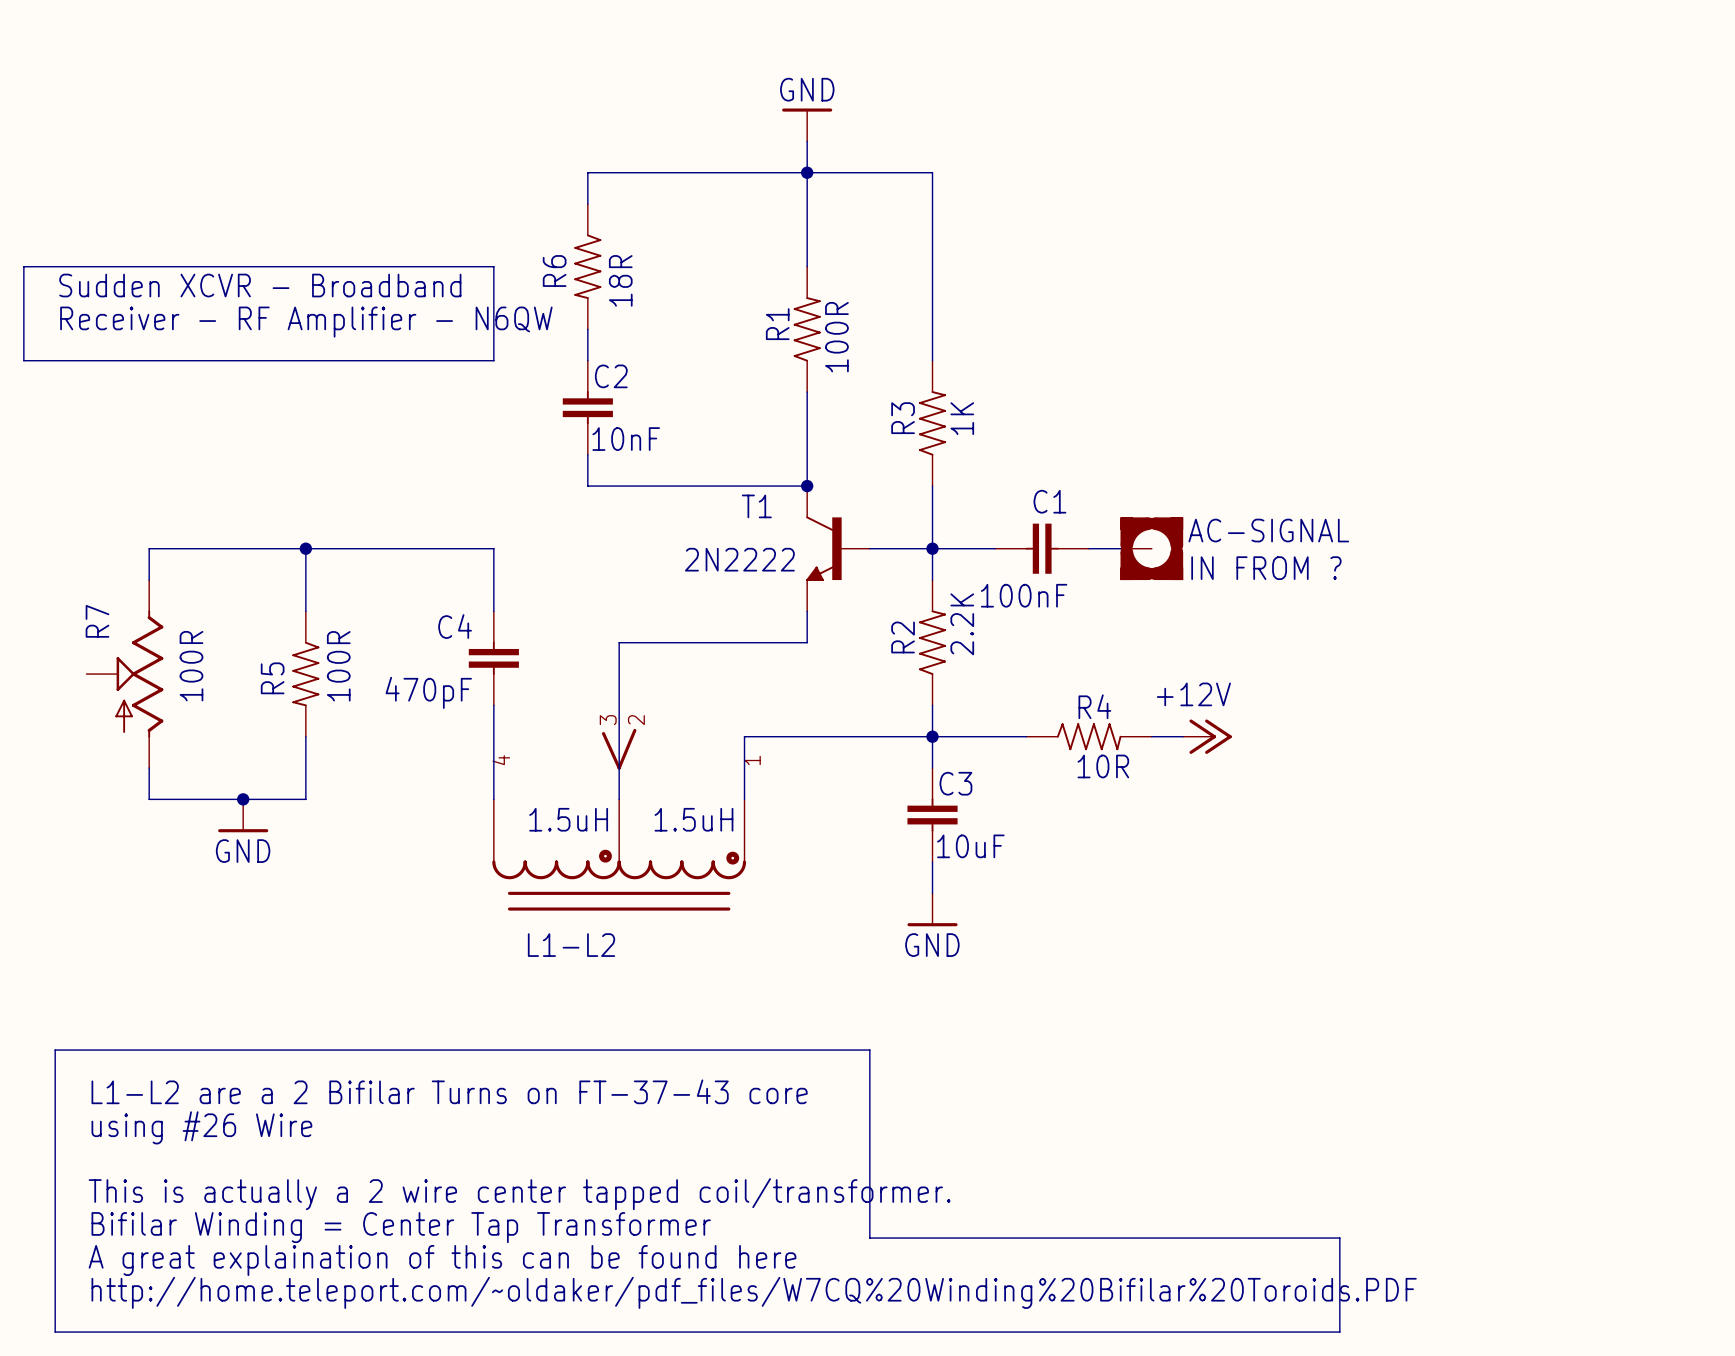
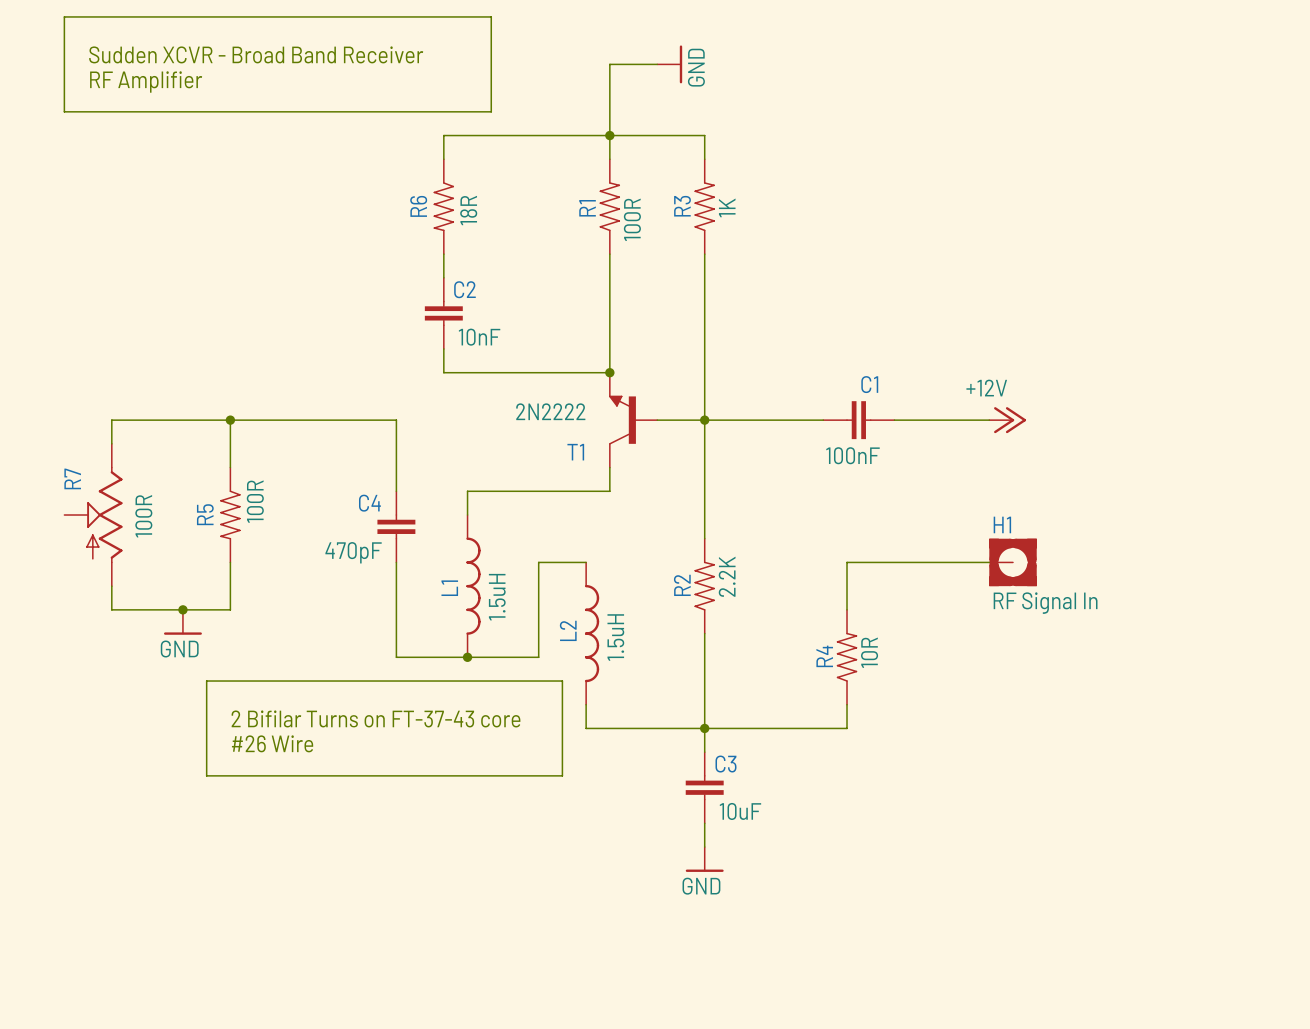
wire: none -> (64, 16) (64, 111) (491, 111) (491, 16) (64, 16)
text: none -> Sudden XCVR - Broad Band Receiver (256, 54)
wire: none -> (657, 64) (609, 64) (609, 111)
text: none -> RF Amplifier (146, 81)
power symbol rotation: 0° (807, 110) -> 90° clockwise (680, 64)
power symbol position: GND (807, 124) -> GND (669, 64)
wire: (23, 266) (23, 360) (493, 360) (493, 266) (23, 266) -> none
text: Sudden XCVR - Broadband (260, 285) -> none
text: Receiver - RF Amplifier - N6QW (306, 322) -> none
R1 position: (807, 329) -> (609, 206)
R3 position: (932, 423) -> (704, 206)
wire: (493, 548) (493, 611) -> (372, 420) (396, 420) (396, 491)
T1 flip: as is (823, 548) -> up-down (622, 420)
C1 position: (1042, 548) -> (858, 420)
AC-SIGNAL: IN FROM ? (1151, 548) -> none
wire: none -> (894, 420) (989, 420)
R2 position: (932, 642) -> (704, 586)
C4 position: (493, 658) -> (396, 526)
wire: (619, 674) (619, 799) -> none
wire: (493, 705) (493, 799) -> none
wire: (744, 736) (744, 799) -> (562, 562) (538, 562) (538, 657) (396, 657) (396, 562)
wire: (775, 736) (1026, 736) -> none
junction: (932, 736) -> none
R4 rotation: 0° (1089, 736) -> 90° counterclockwise (847, 657)
R4 position: (1089, 736) -> (847, 657)
wire: none -> (870, 562) (847, 562) (847, 609)
wire: none -> (894, 562) (989, 562)
part position: (1207, 736) -> (1007, 420)
H1: none -> RF Signal In (1013, 562)
L1: none -> 1.5uH (473, 586)
C3 position: (932, 815) -> (704, 787)
text: 1.5uH (568, 819) -> none
L1-L2: (619, 819) -> none
text: 1.5uH (693, 819) -> none
L2: none -> 1.5uH (592, 633)
junction: none -> (467, 657)
wire: none -> (206, 681) (206, 775) (562, 775) (562, 681) (206, 681)
wire: none -> (704, 681) (704, 752)
power symbol position: GND (932, 909) -> GND (704, 859)
wire: none -> (586, 704) (586, 728) (847, 728) (847, 704)
text: none -> 2 Bifilar Turns on FT-37-43 core (376, 718)
junction: none -> (704, 728)
text: none -> #26 Wire (272, 743)
wire: (55, 1050) (55, 1332) (1339, 1332) (1339, 1238) (869, 1238) (869, 1050) (55, 1050) -> none
wire: none -> (704, 823) (704, 847)
text: L1-L2 are a 2 Bifilar Turns on FT-37-43 core (449, 1091) -> none
text: using #26 Wire (201, 1127) -> none
text: This is actually a 2 wire center tapped coil/transformer. (519, 1194) -> none
text: Bifilar Winding = Center Tap Transformer (401, 1227) -> none
text: A great explaination of this can be found here (442, 1260) -> none
text: http://home.teleport.com/~oldaker/pdf_files/W7CQ%20Winding%20Bifilar%20Toroids.PDF (754, 1292) -> none

